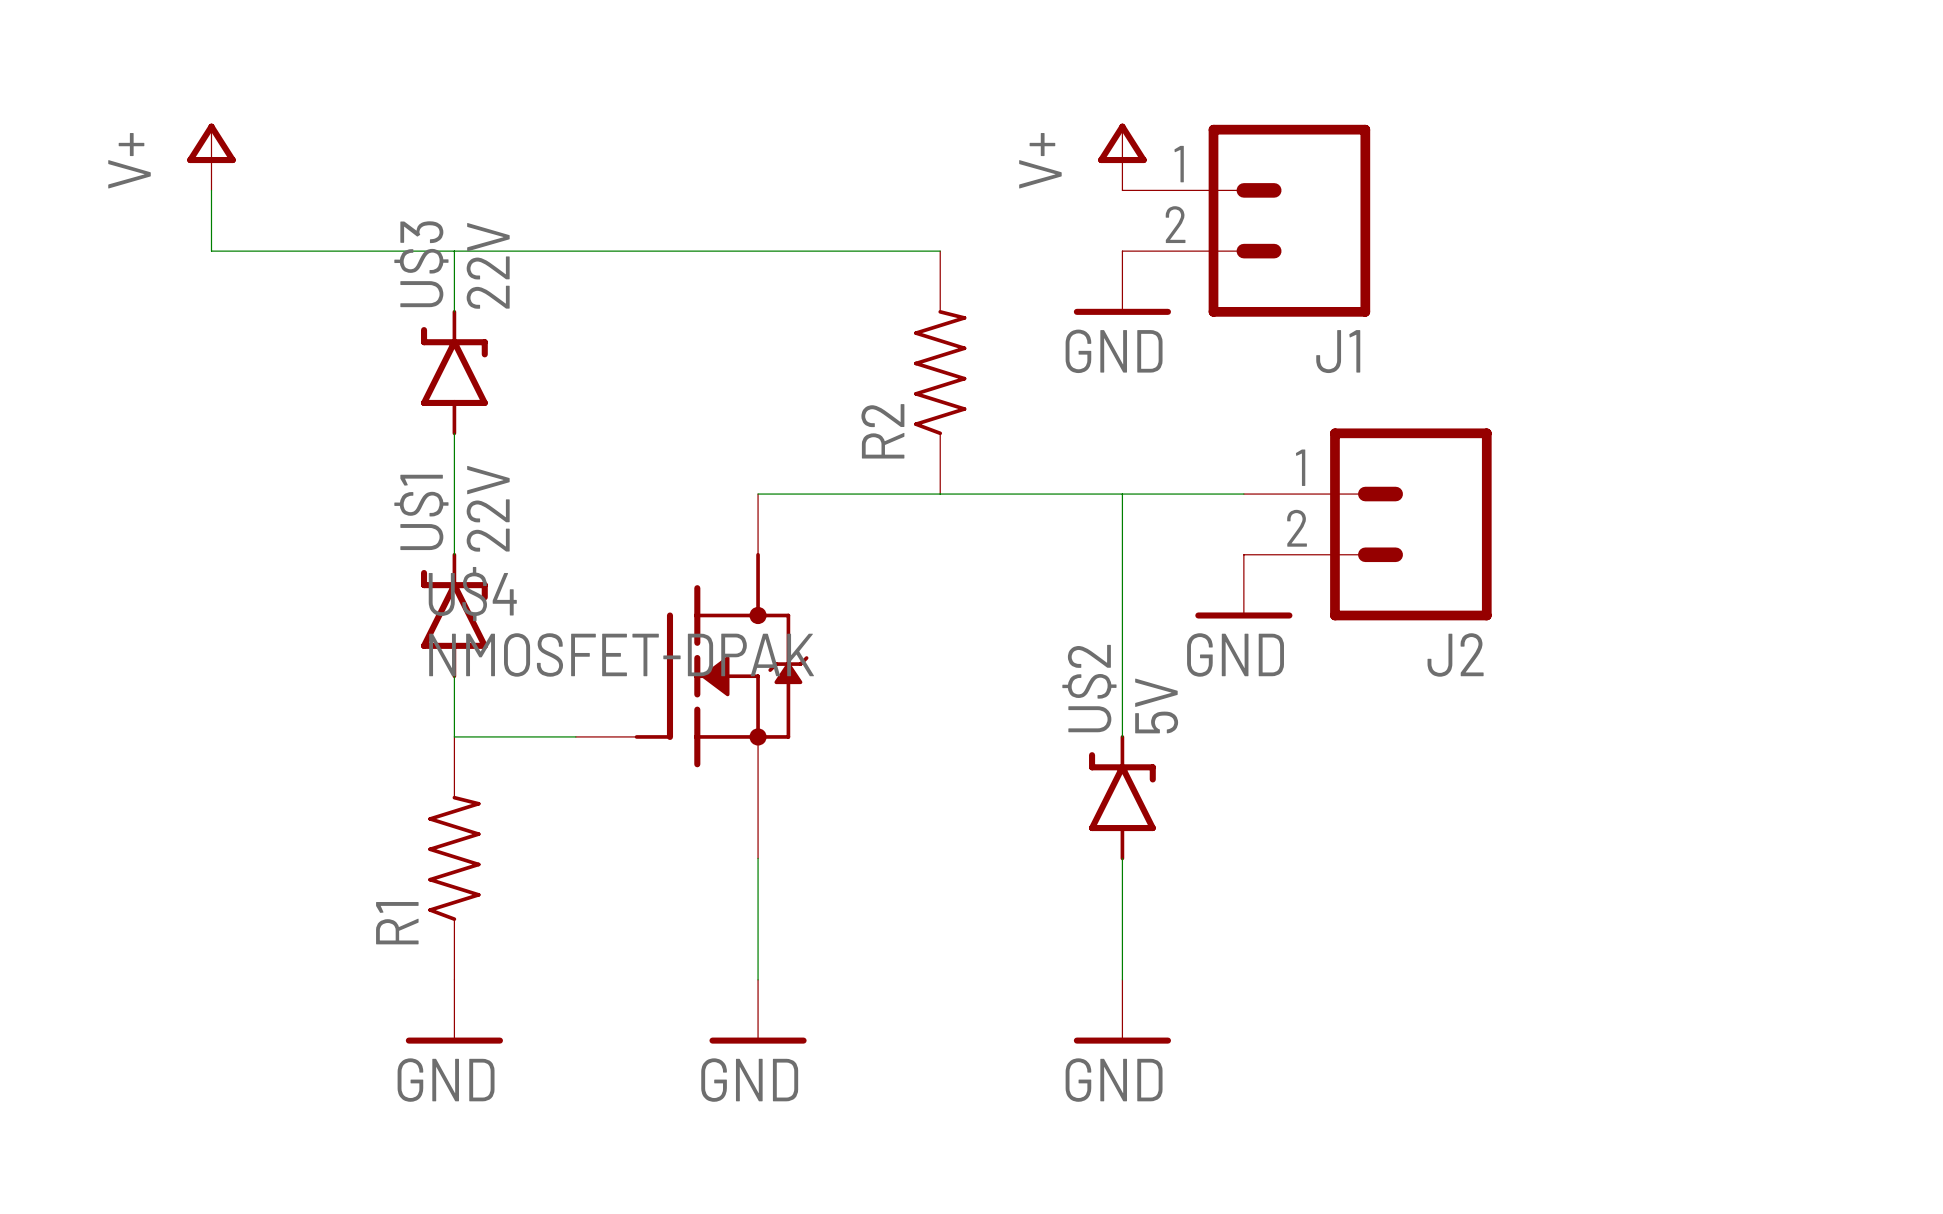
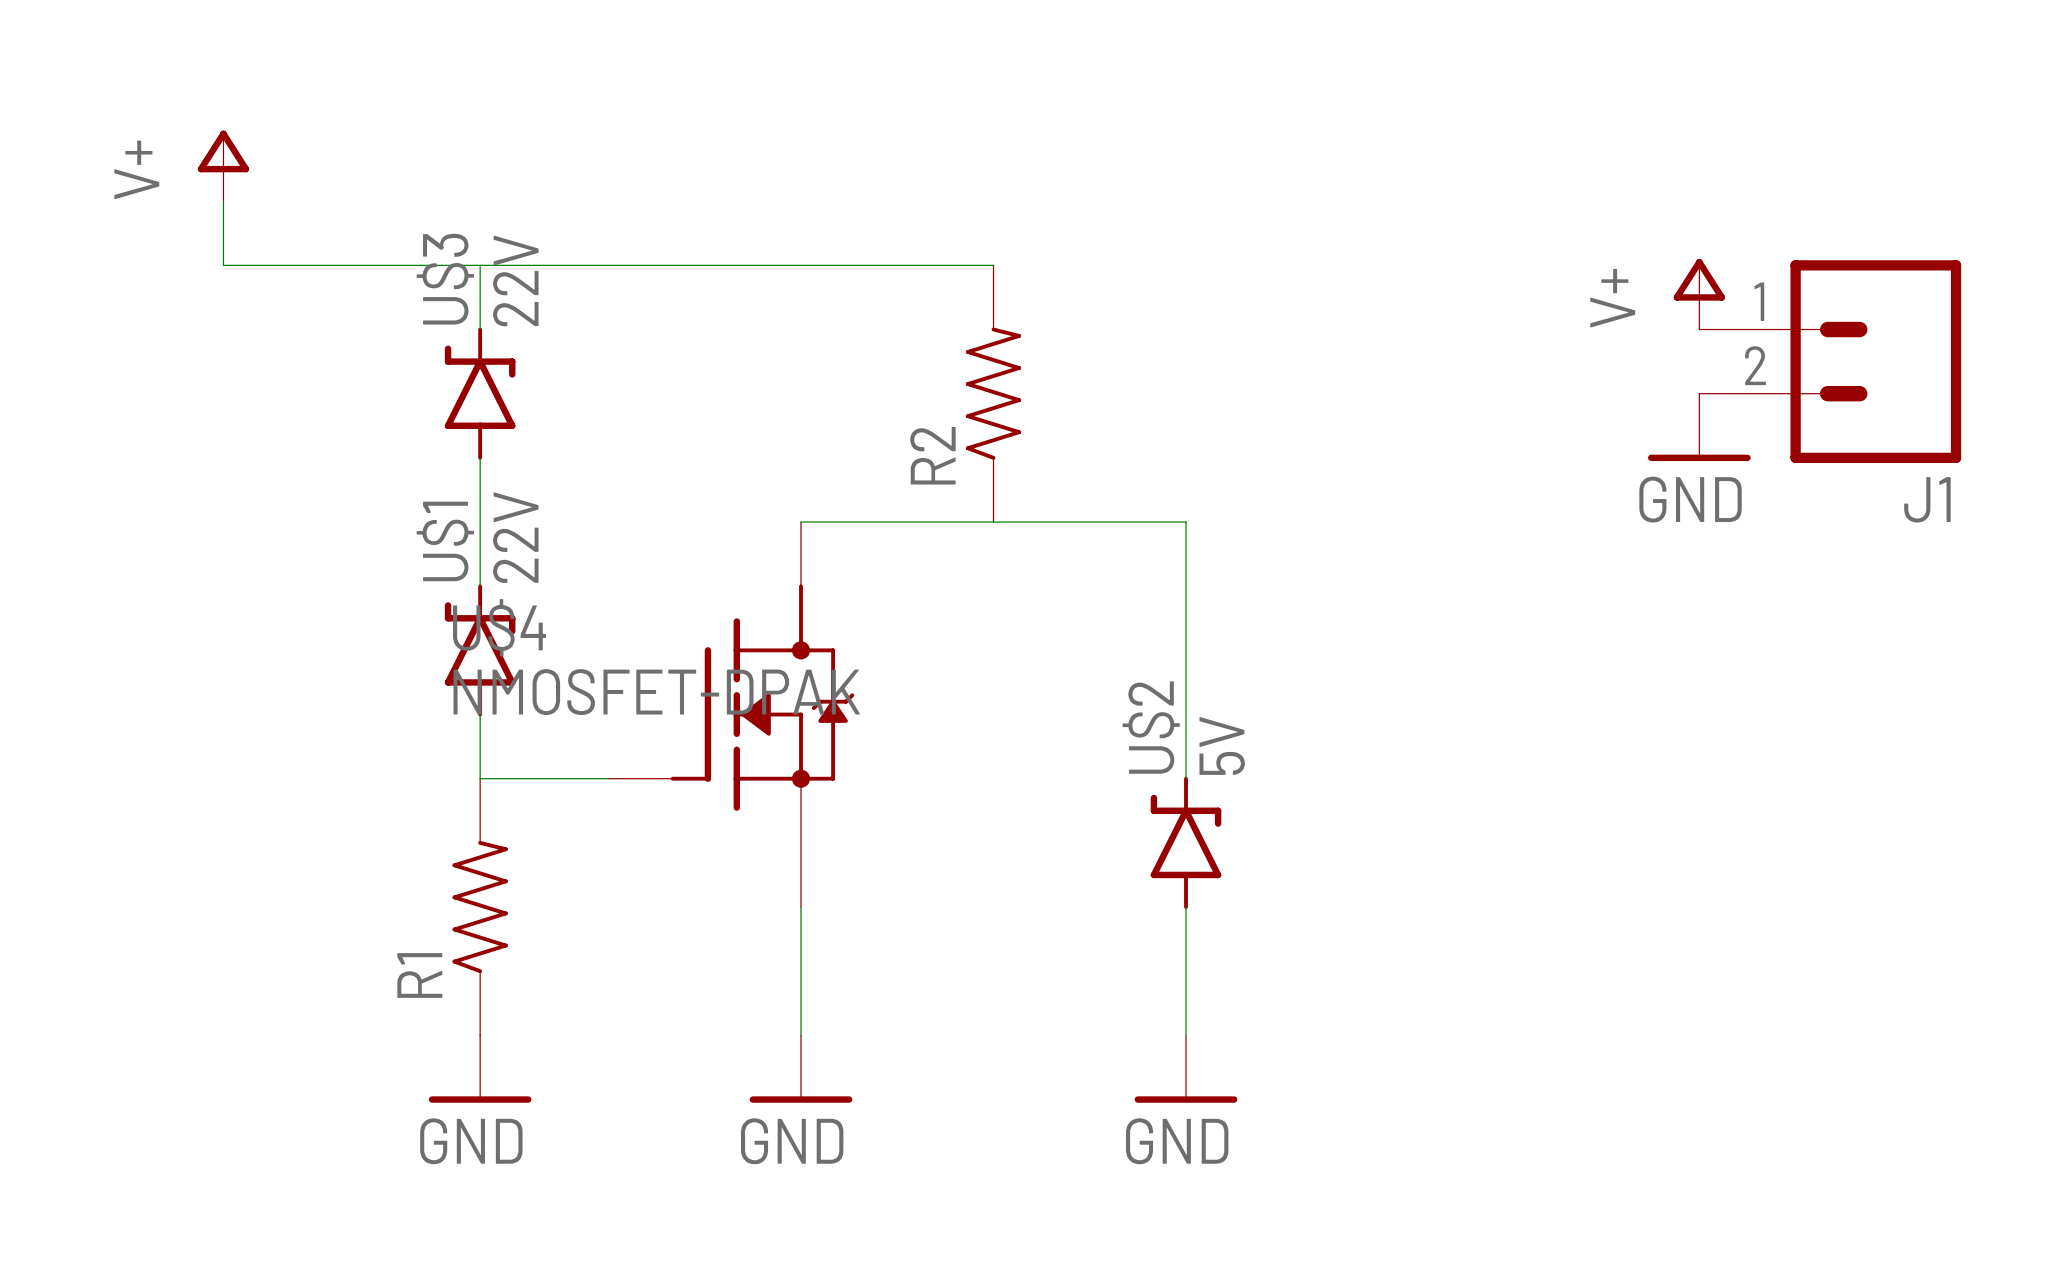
power symbol position: V+ (1122, 156) -> V+ (1699, 294)
J1 position: (1246, 220) -> (1830, 361)
power symbol: GND (1122, 283) -> none
power symbol: none -> GND (1699, 427)
wire: (1122, 494) (1243, 494) -> none
J2: (1367, 524) -> none
power symbol: GND (1243, 586) -> none

